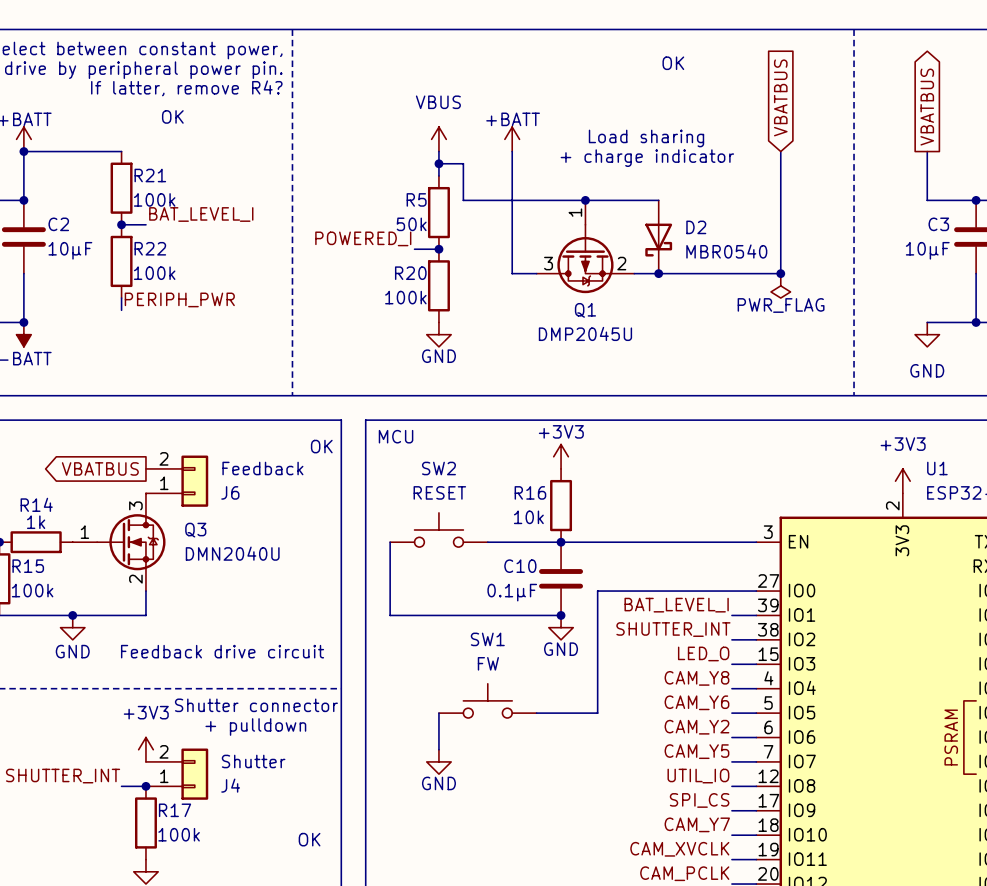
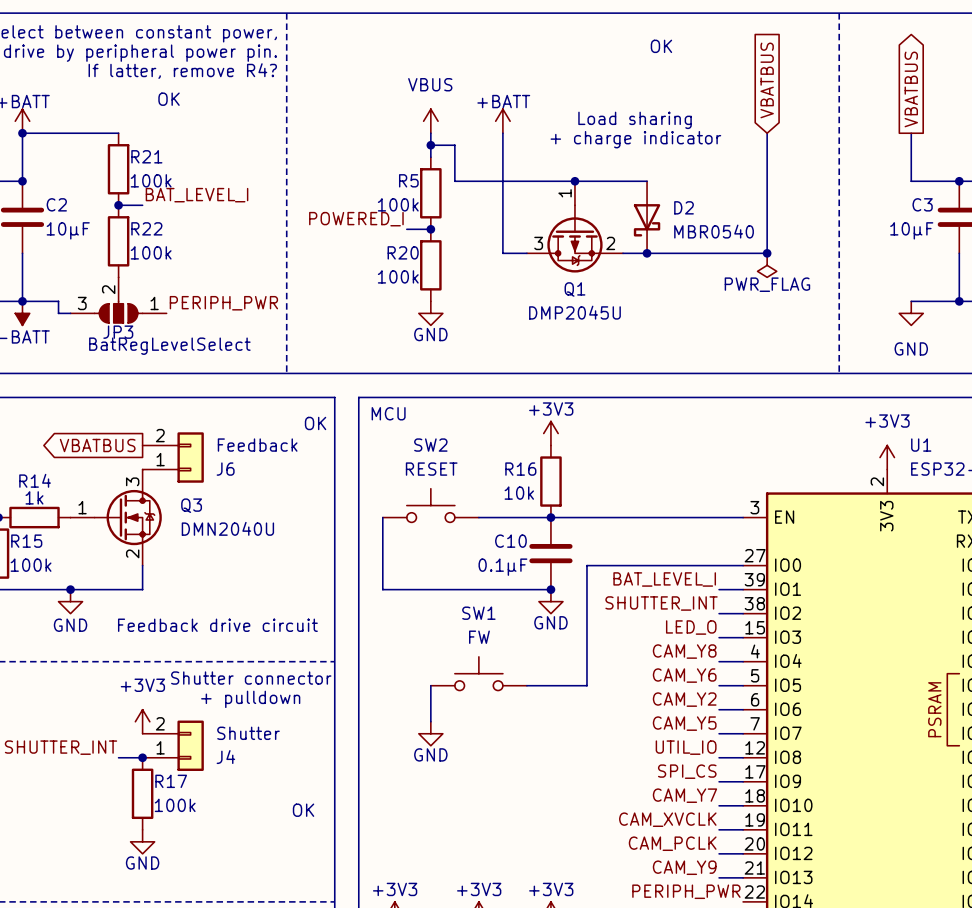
R5 value: 50k (411, 224) -> 100k (398, 204)
label position: PERIPH_PWR (179, 299) -> PERIPH_PWR (223, 303)
JP3: none -> BatRegLevelSelect (118, 300)
wire: none -> (22, 301) (58, 301) (58, 313) (70, 313)

